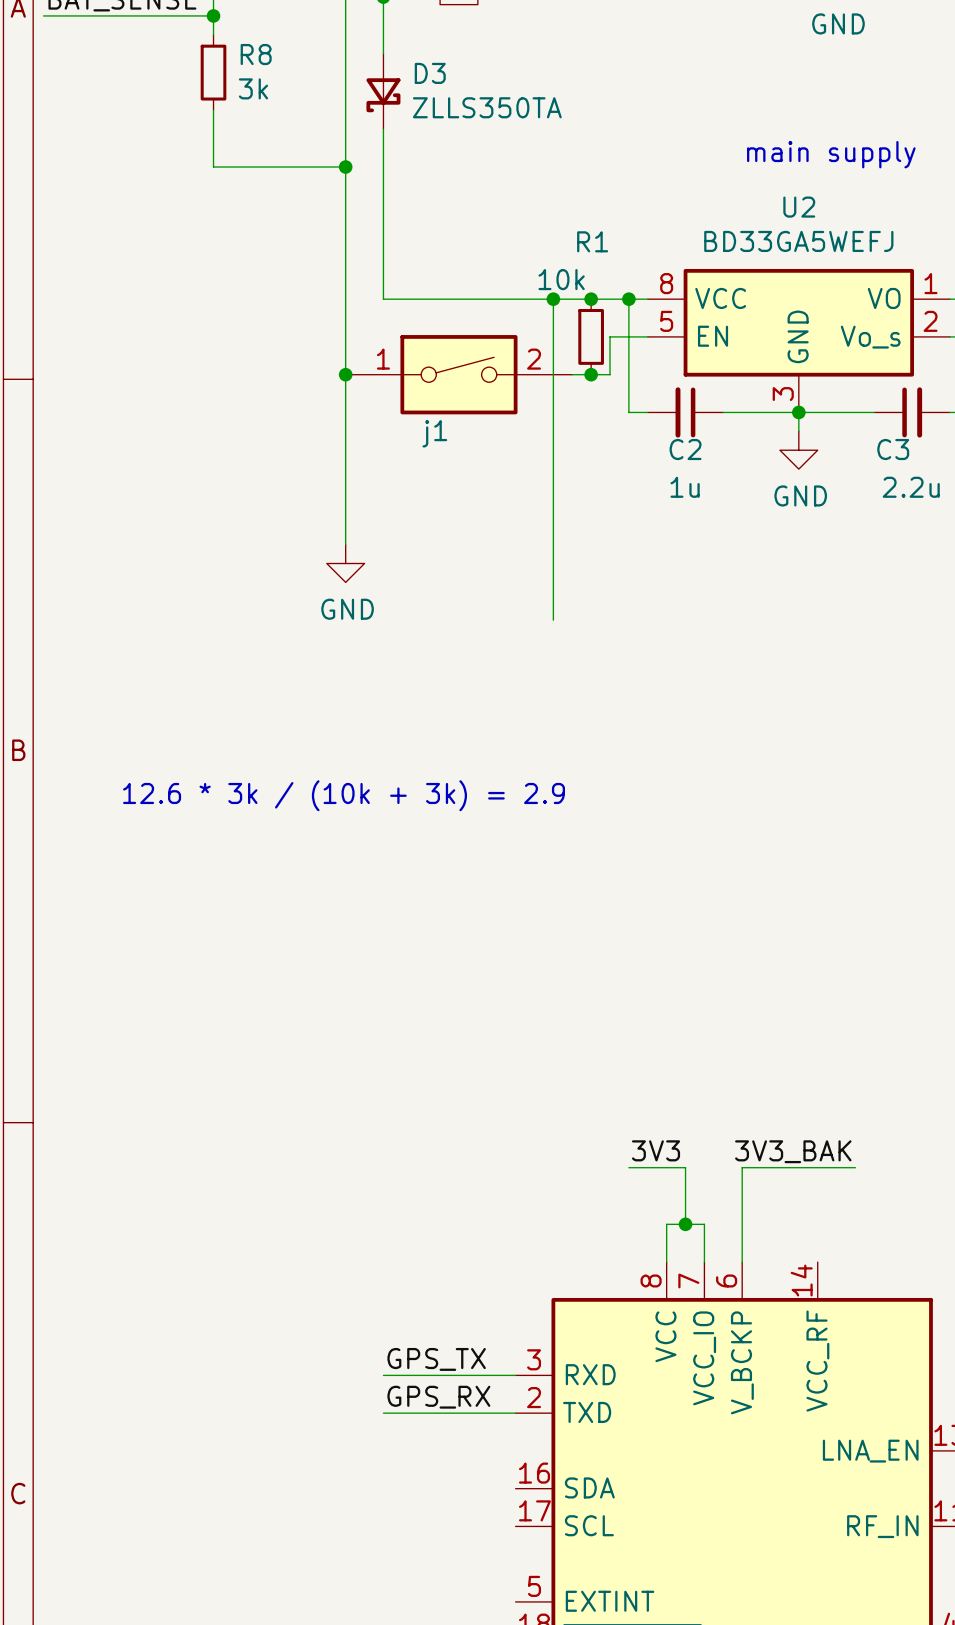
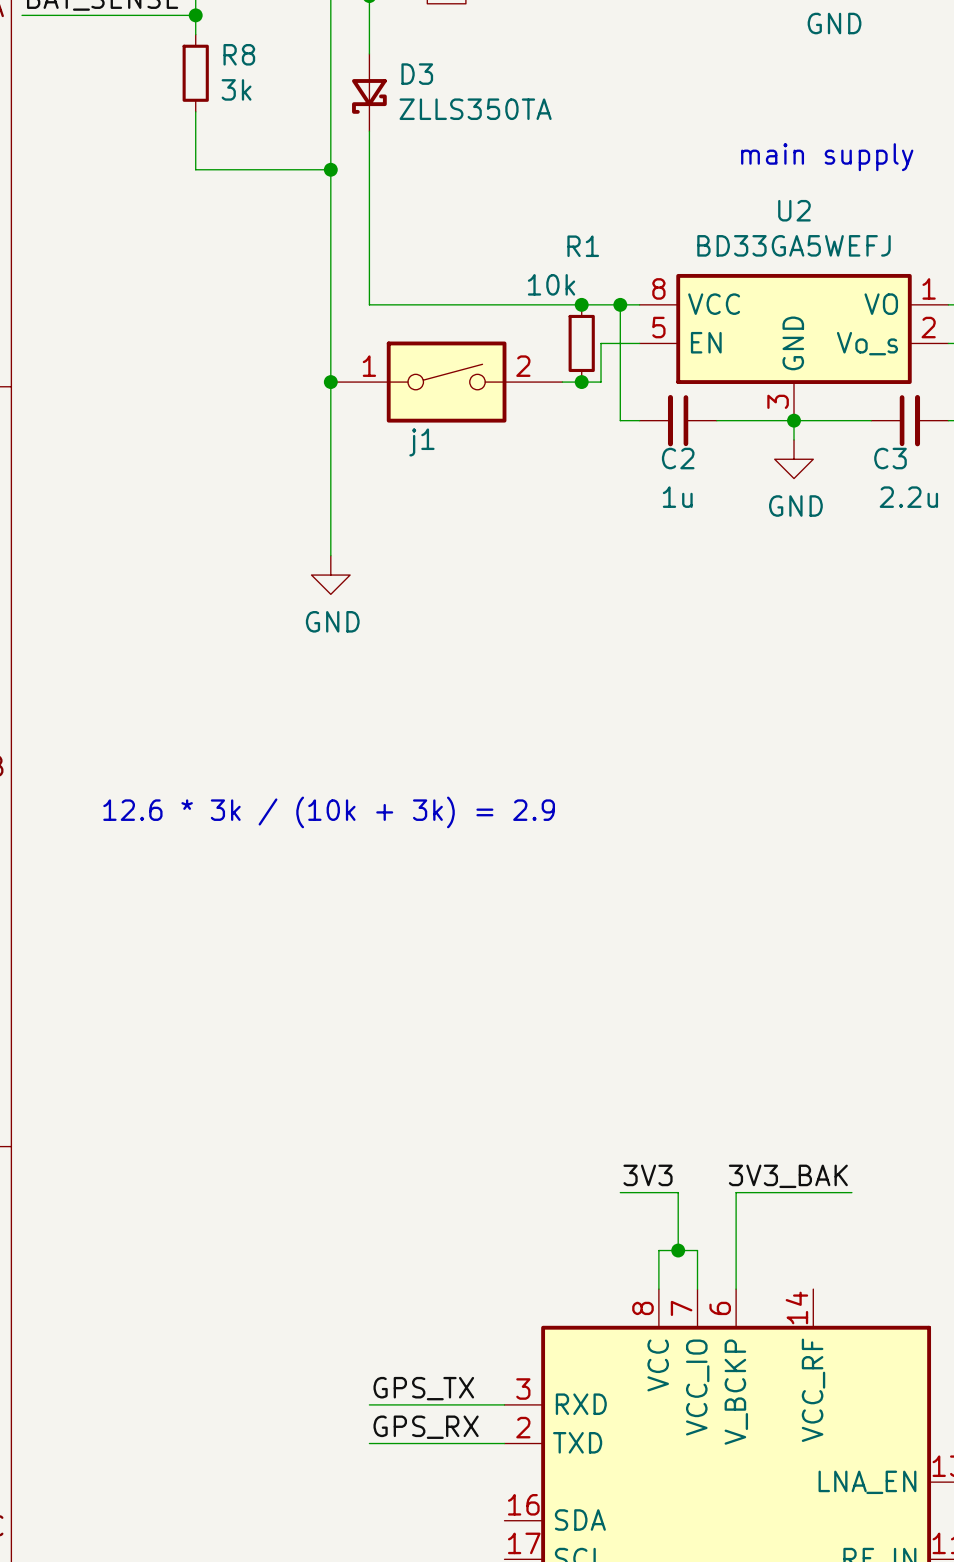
wire: (553, 299) (553, 620) -> none
junction: (553, 299) -> none

